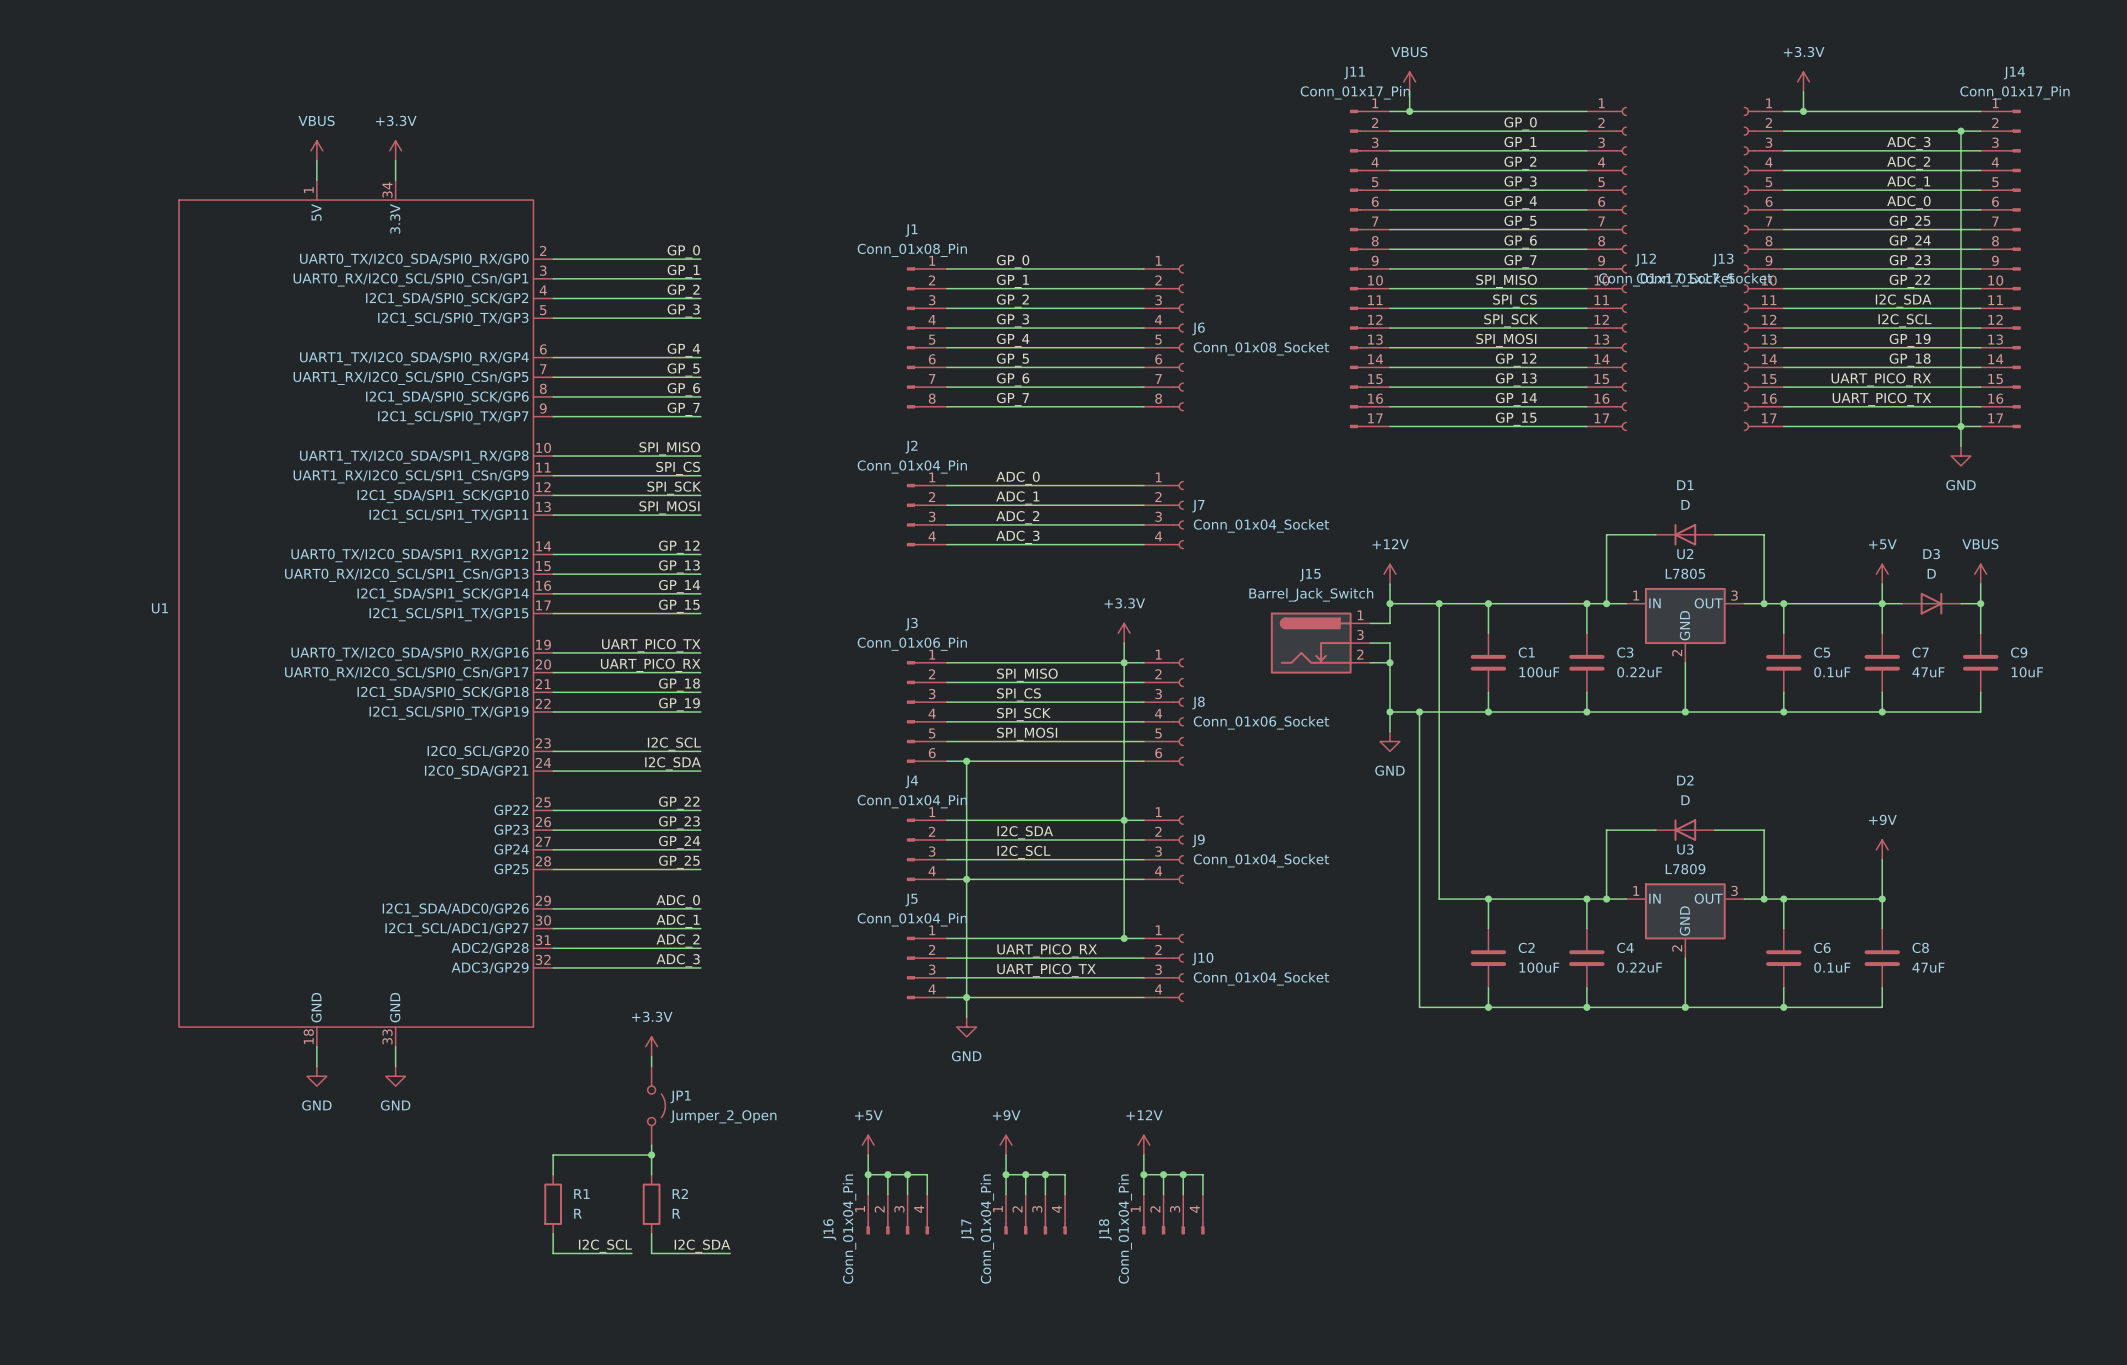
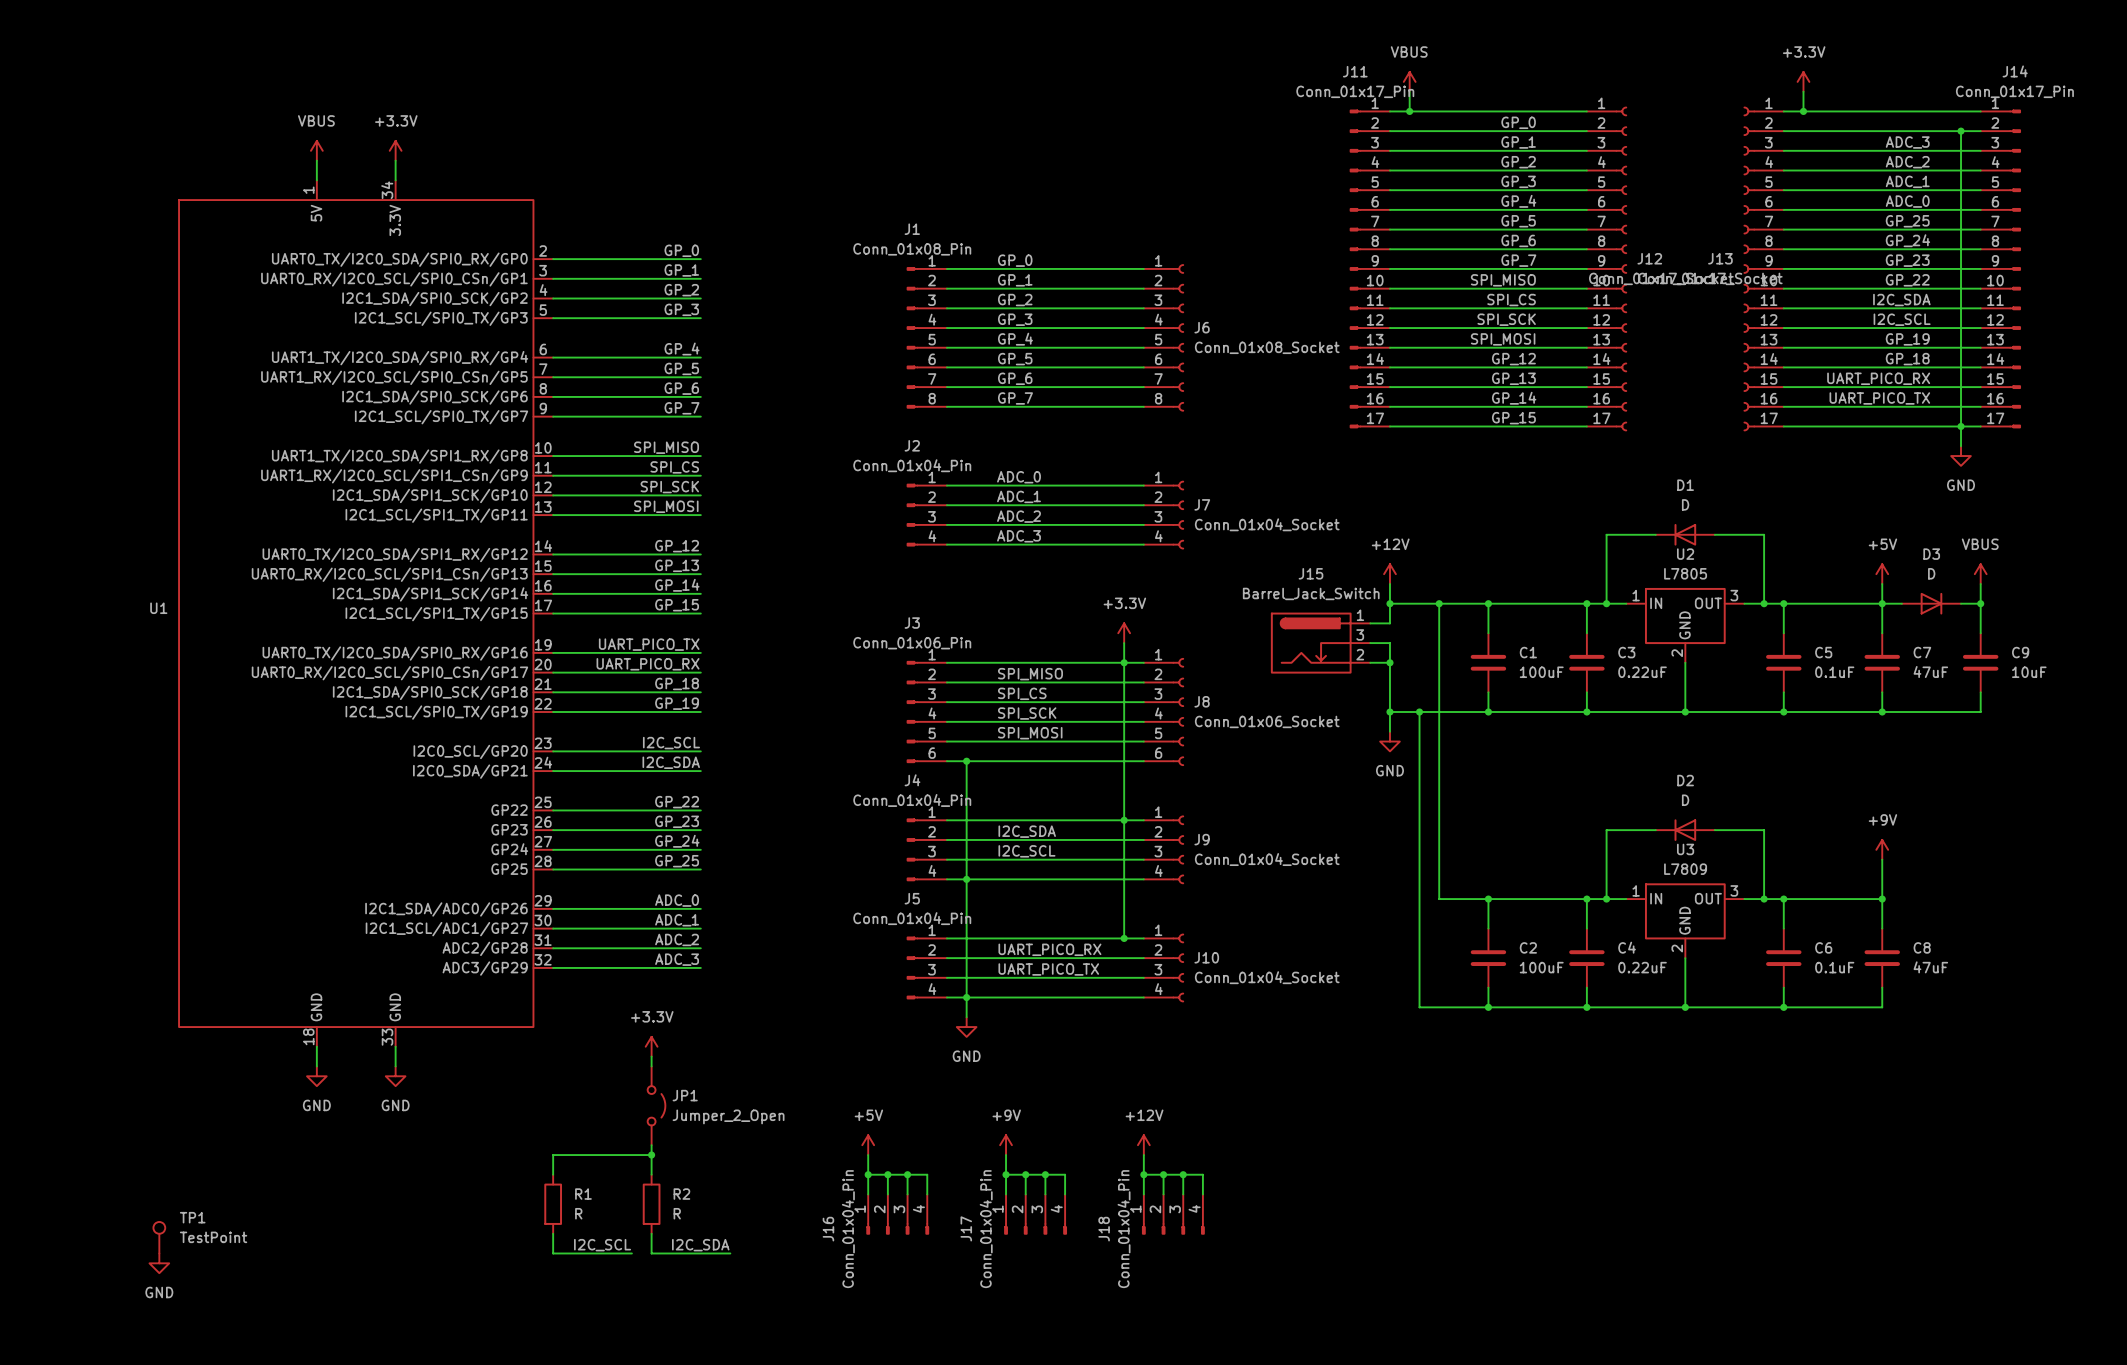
TP1: none -> TestPoint (159, 1237)
power symbol: none -> GND (159, 1263)

